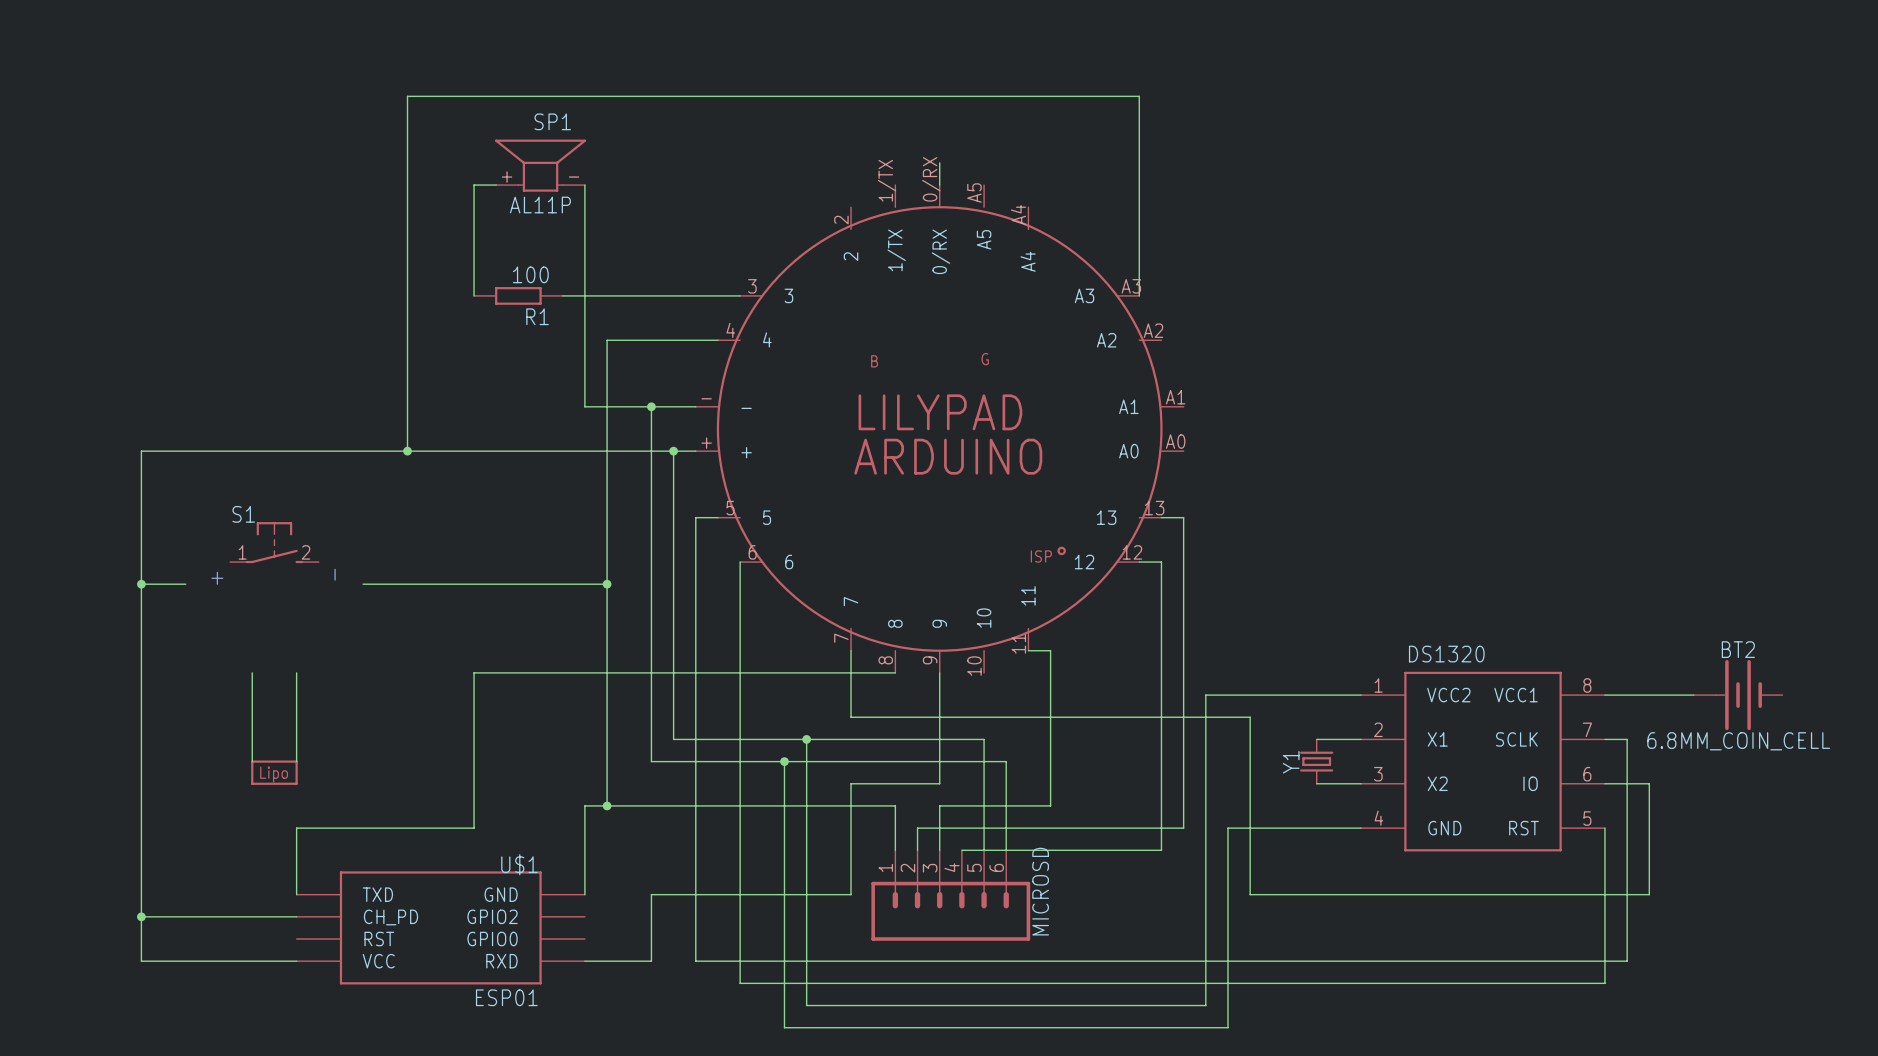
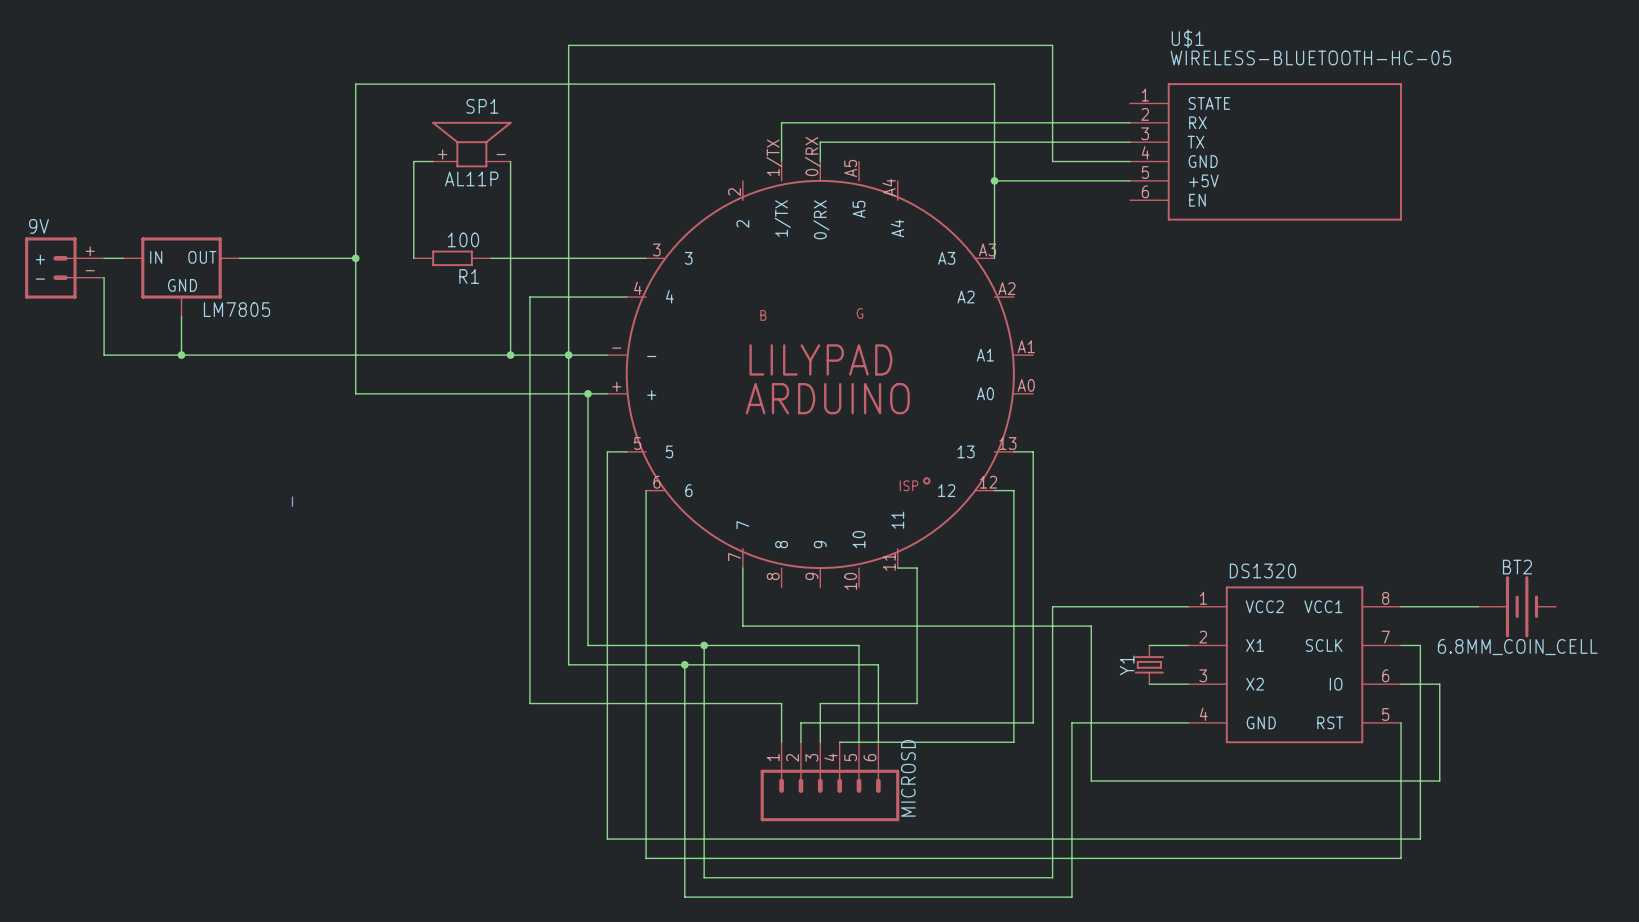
wire: none -> (1130, 122) (781, 122) (781, 161)
wire: none -> (820, 142) (1130, 142)
wire: none -> (1130, 161) (1052, 161) (1052, 45) (568, 45) (568, 355)
wire: none -> (994, 180) (1130, 180)
junction: none -> (994, 180)
wire: none -> (104, 258) (123, 258)
wire: none -> (239, 258) (355, 258)
junction: none -> (355, 258)
9V: none -> (64, 268)
LM7805: none -> (181, 276)
wire: none -> (104, 277) (104, 355) (510, 355)
wire: none -> (181, 316) (181, 355)
junction: none -> (181, 355)
junction: none -> (510, 355)
wire: (407, 451) (141, 451) (141, 961) (296, 961) -> none
junction: (407, 451) -> none
S1: (274, 542) -> none
text: + (217, 578) -> none
wire: (141, 584) (185, 584) -> none
junction: (141, 584) -> none
wire: (363, 584) (607, 584) -> none
junction: (607, 584) -> none
wire: (252, 672) (252, 761) -> none
wire: (296, 672) (296, 761) -> none
wire: (895, 672) (474, 672) (474, 828) (296, 828) (296, 894) -> none
wire: (939, 672) (939, 783) (851, 783) (851, 894) (651, 894) (651, 961) (584, 961) -> none
part: (274, 772) -> none
wire: (607, 805) (584, 805) (584, 894) -> none
junction: (607, 805) -> none
U$1 name position: U$1 (519, 864) -> U$1 (1187, 38)
U$1 symbol: [296, 871, 585, 985] -> [1130, 83, 1402, 221]
wire: (141, 916) (296, 916) -> none
junction: (141, 916) -> none
U$1 value: ESP01 (506, 997) -> WIRELESS-BLUETOOTH-HC-05 (1310, 57)

